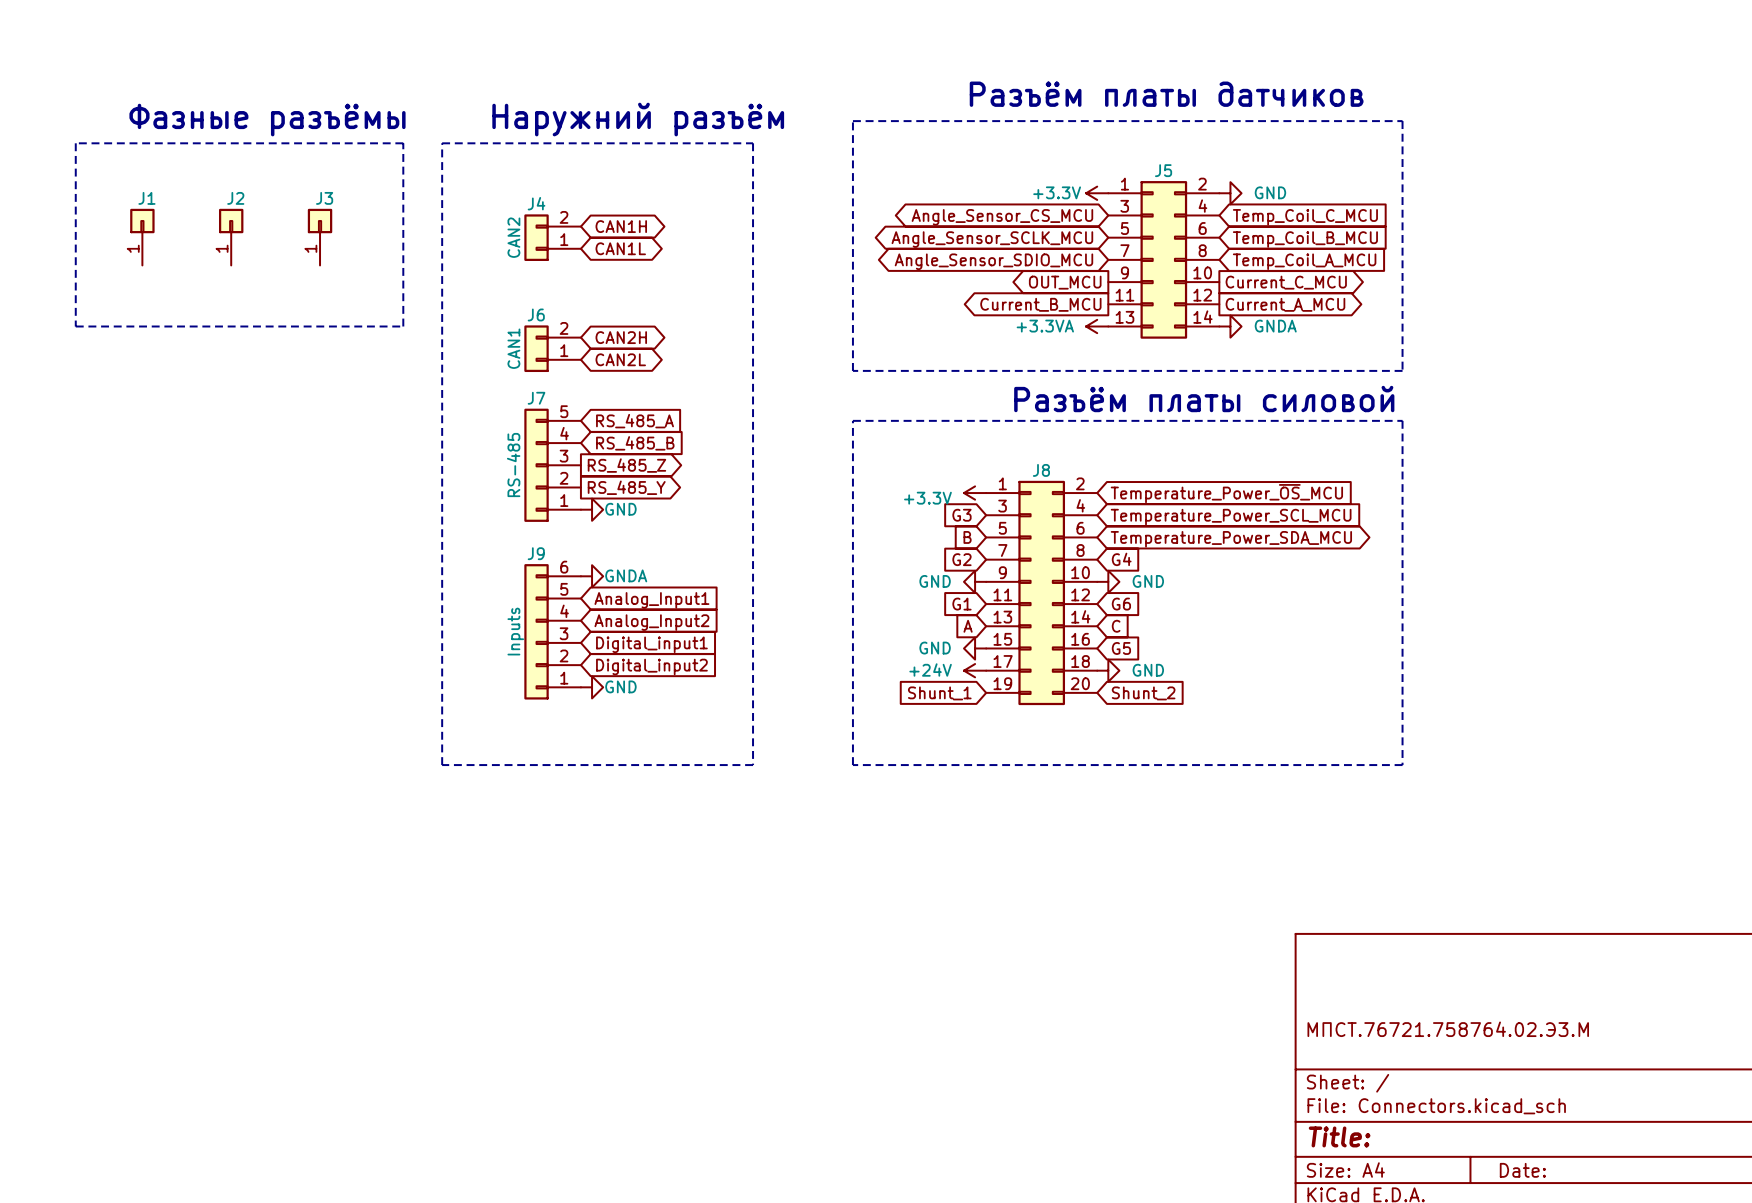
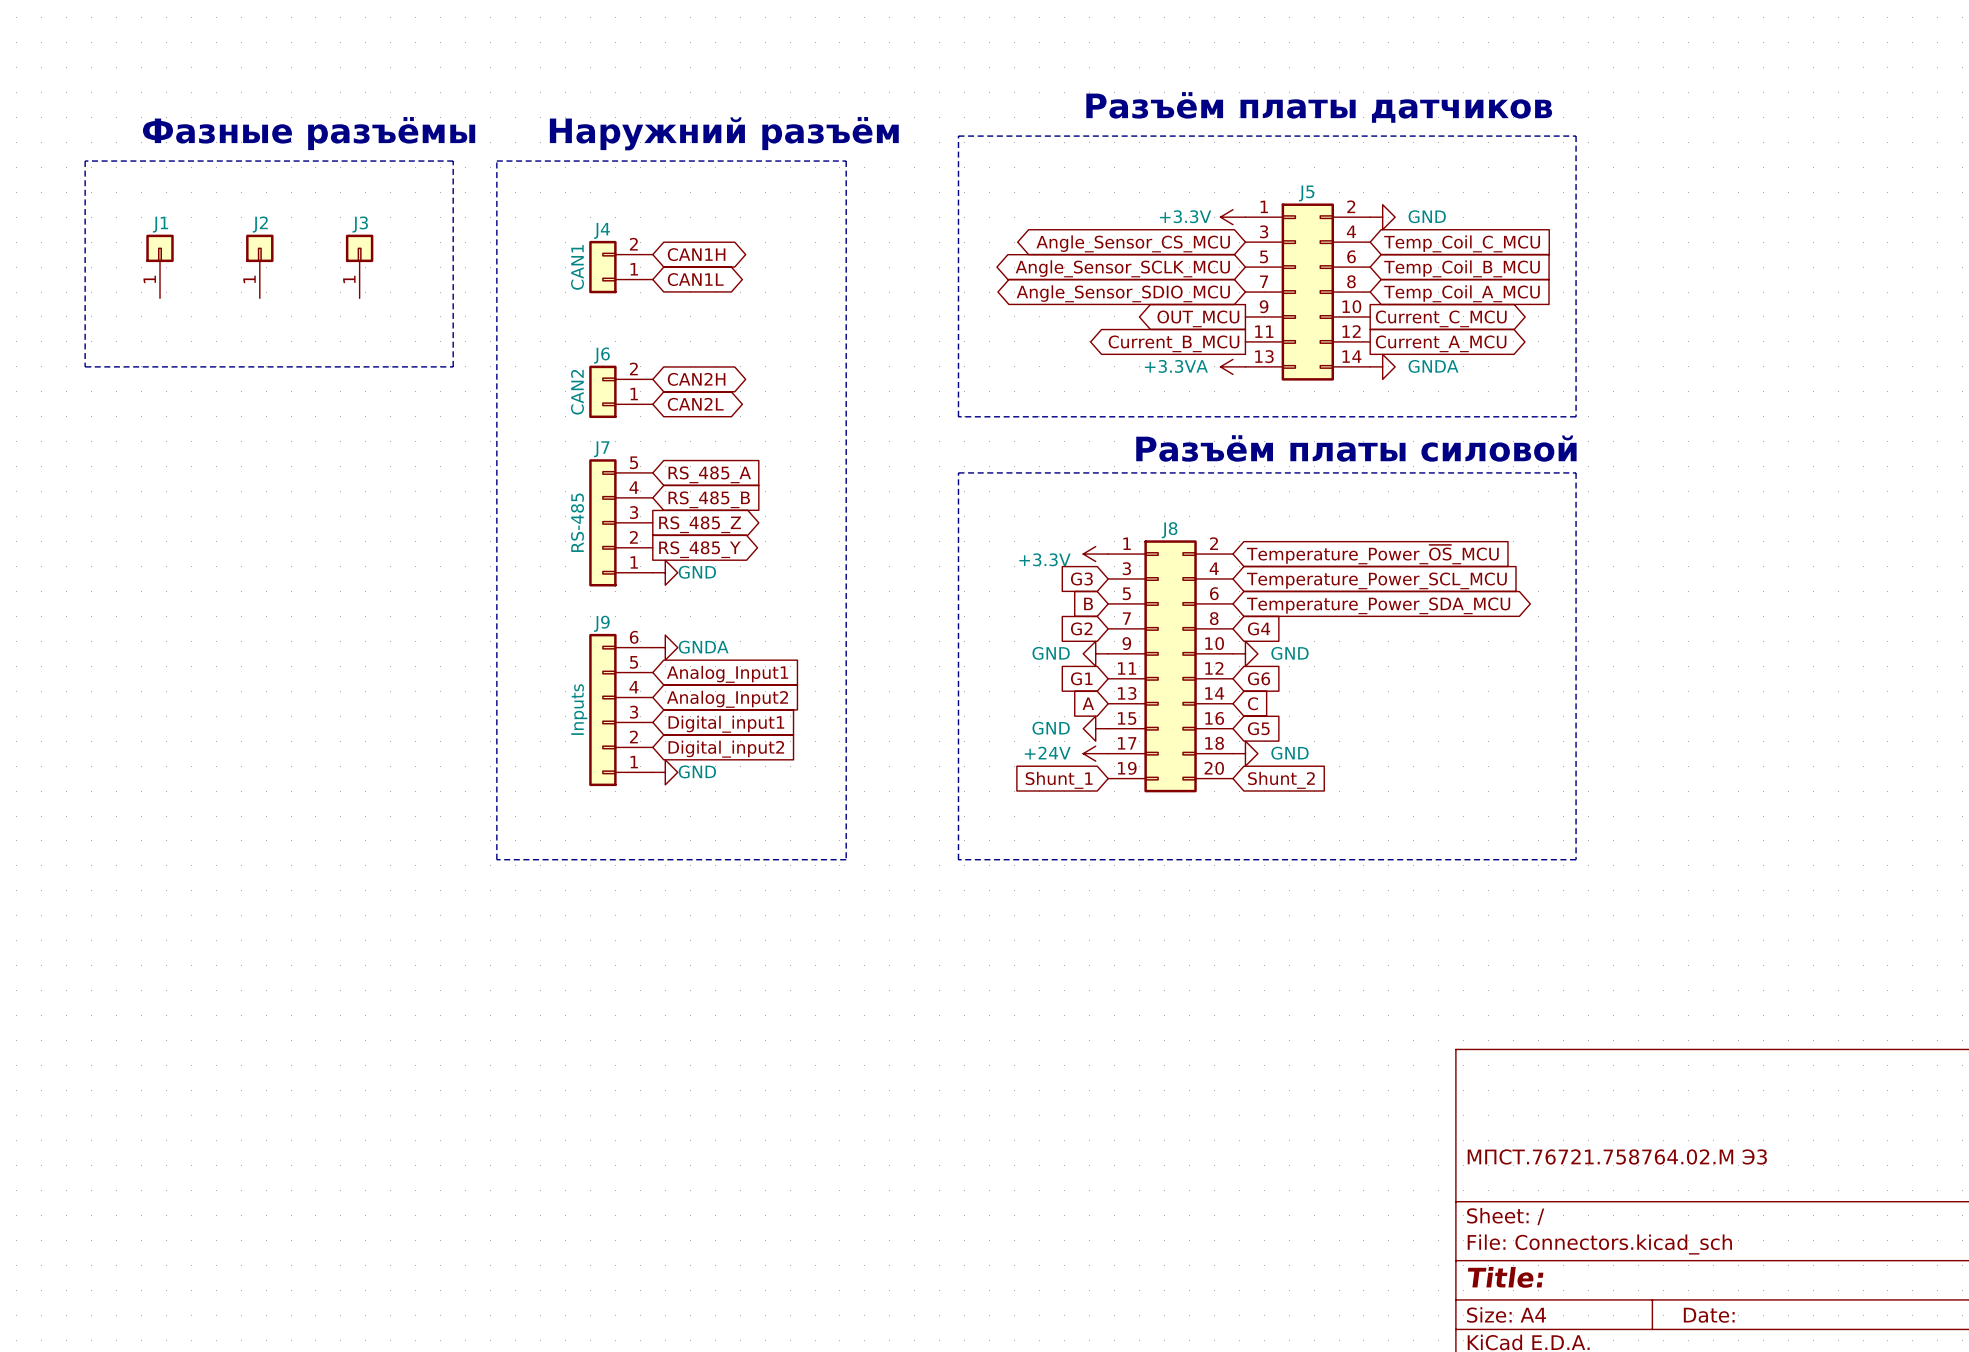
J4 value: CAN2 (513, 237) -> CAN1 (577, 267)
J6 value: CAN1 (513, 348) -> CAN2 (577, 392)
title block: МПСТ.76721.758764.02.Э3.М (1448, 1029) -> МПСТ.76721.758764.02.М Э3 (1617, 1156)

